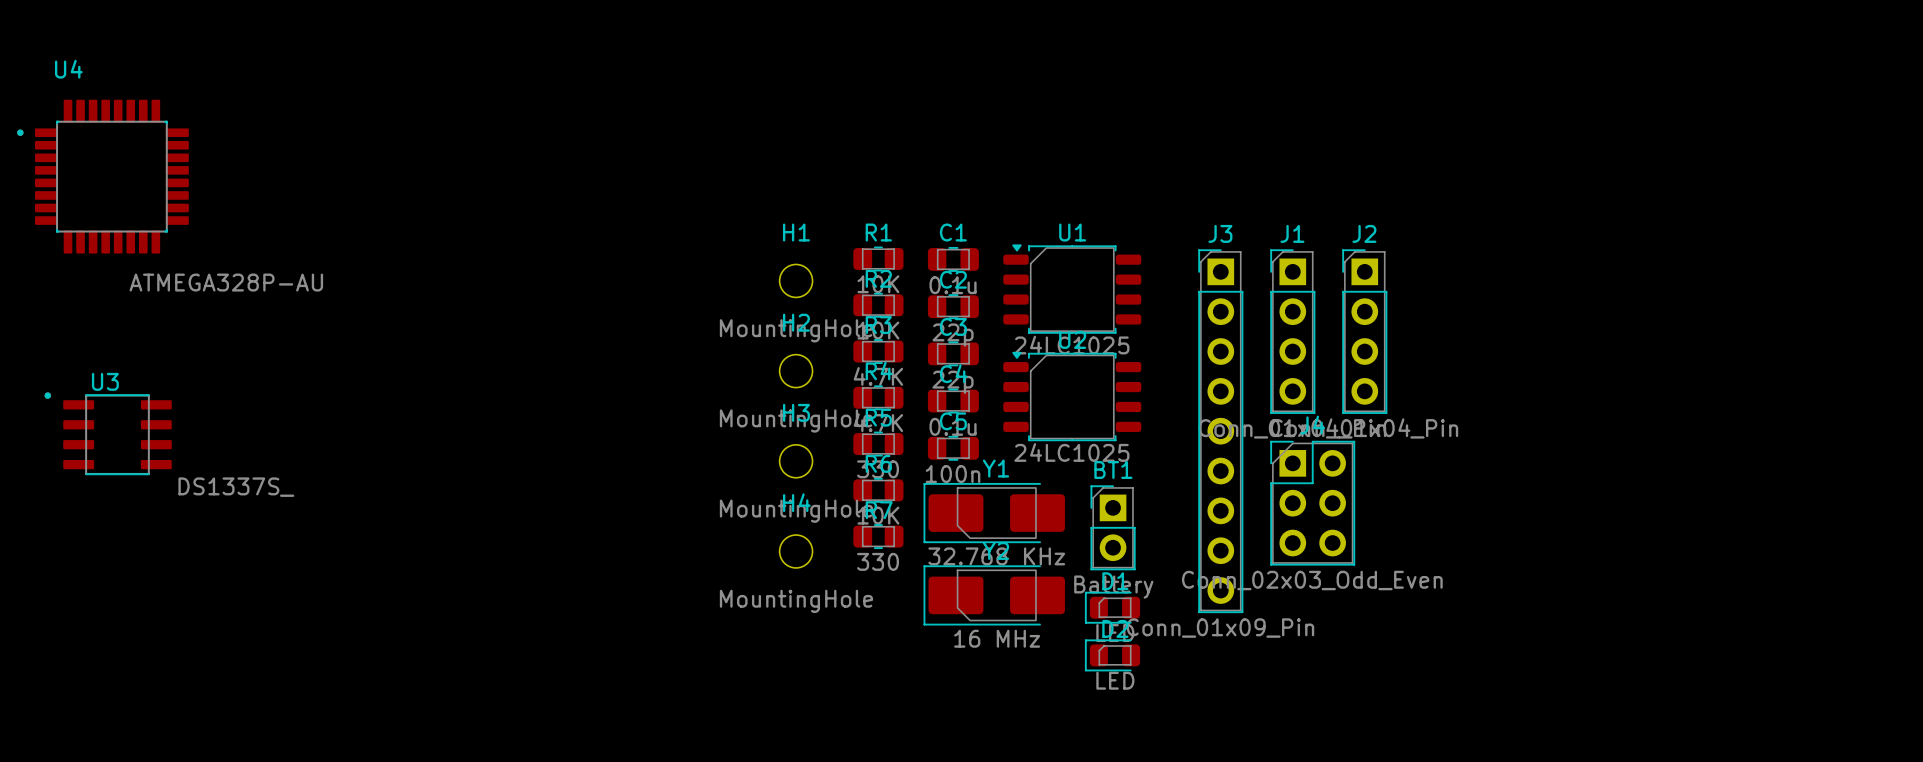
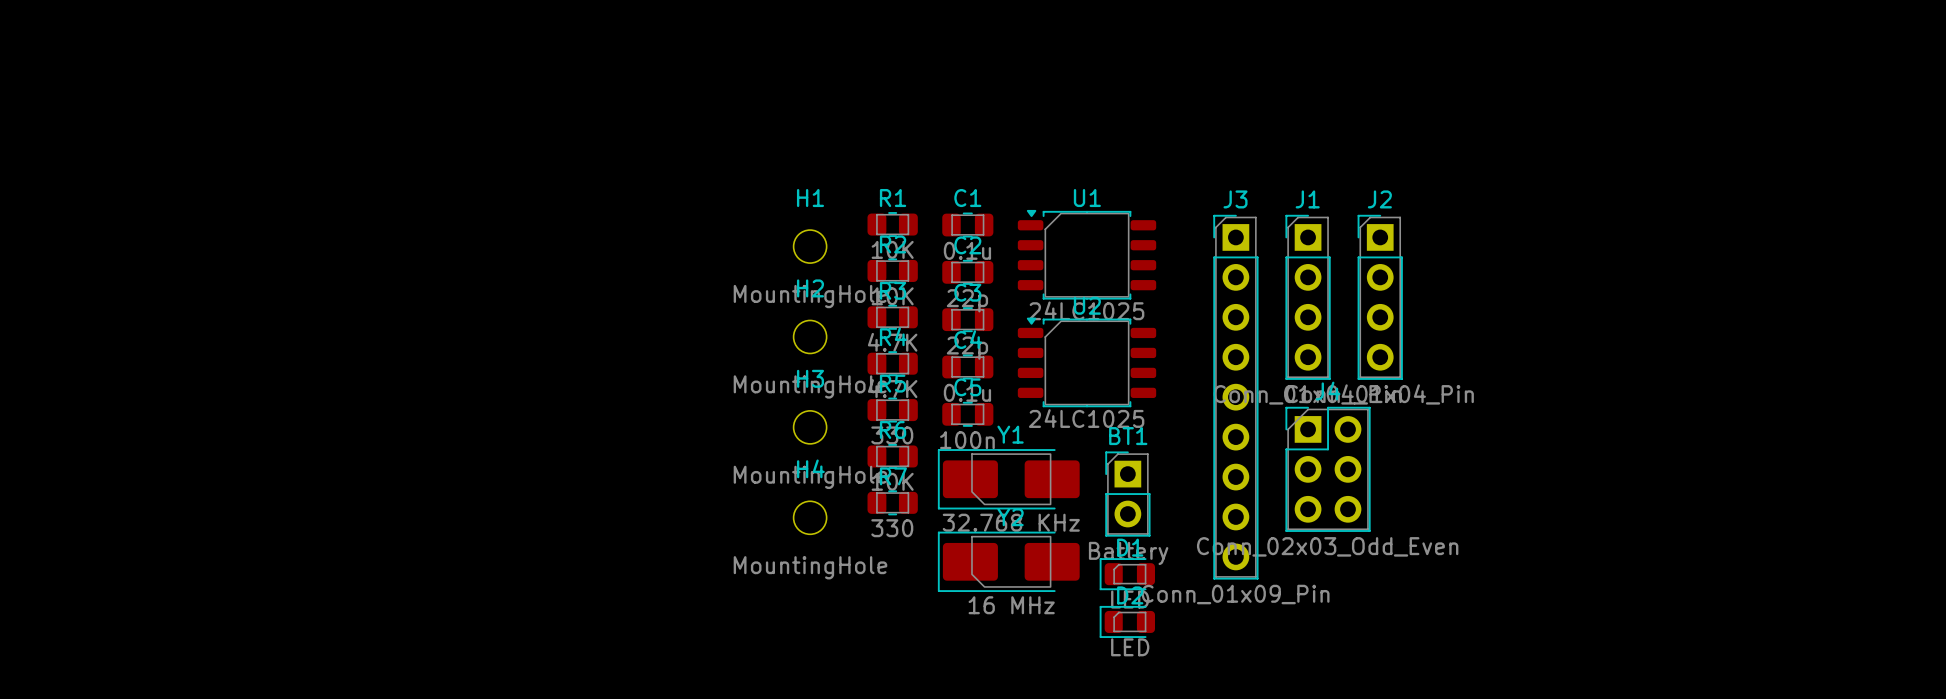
U4: ATMEGA328P-AU (103, 176) -> none
U3: DS1337S_ (108, 433) -> none

